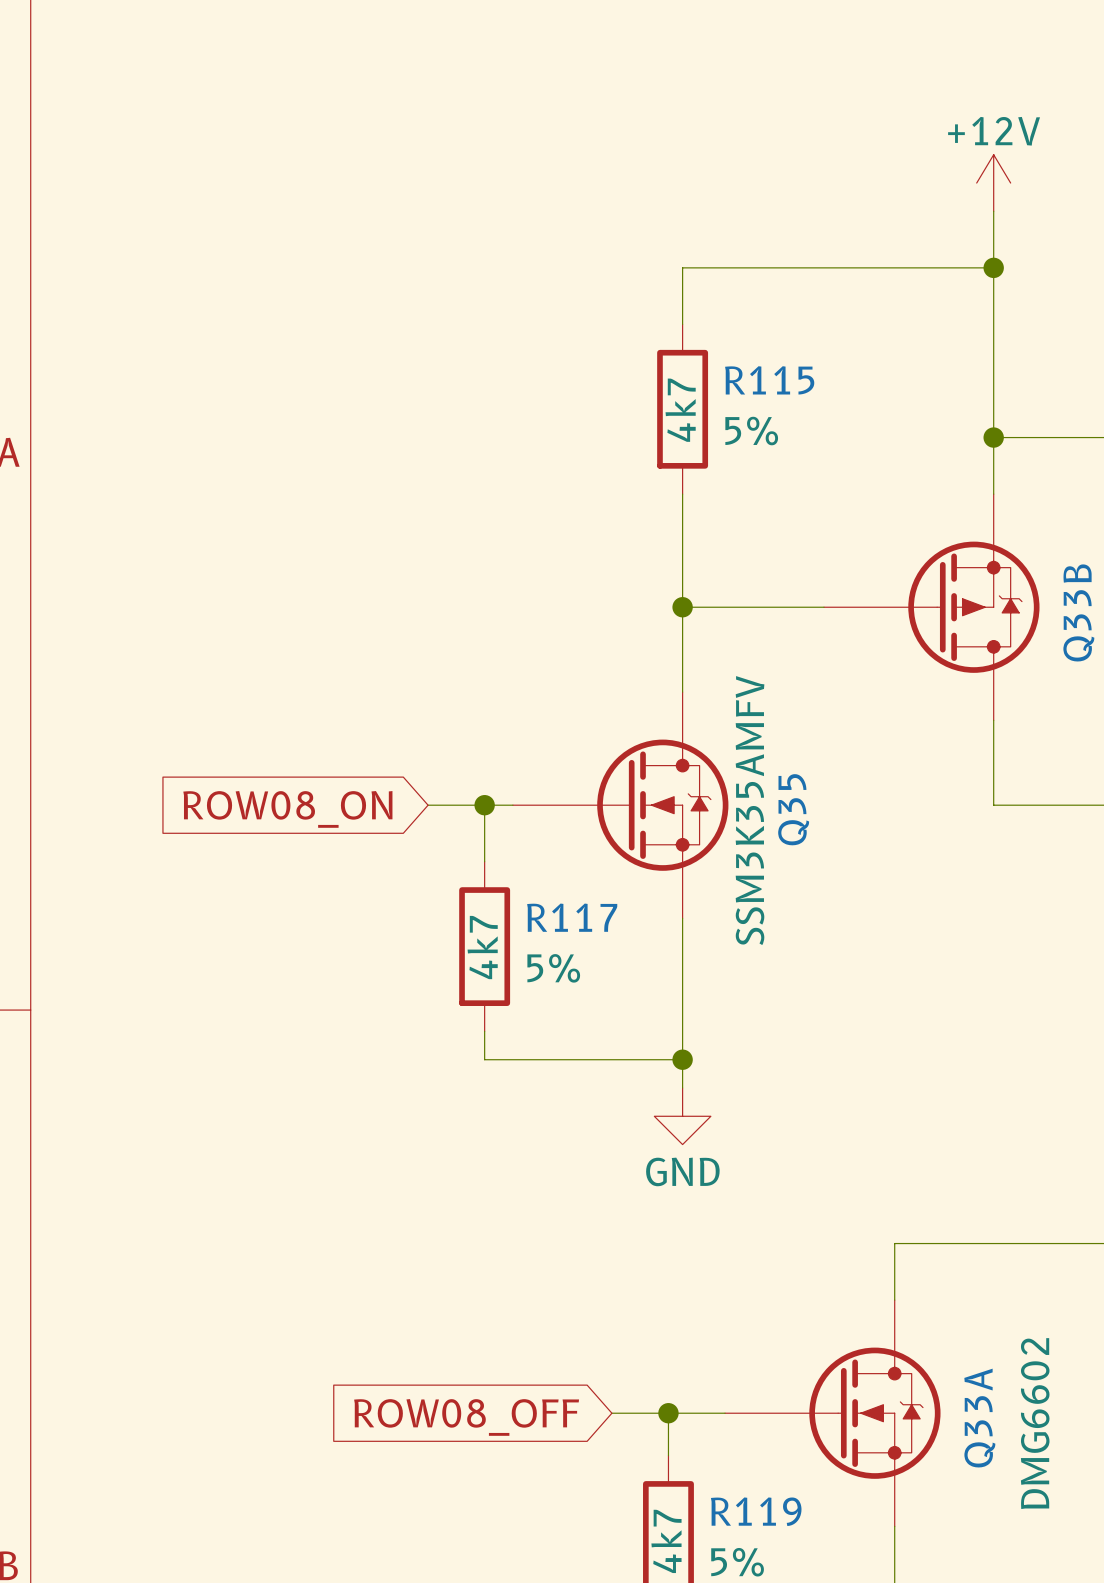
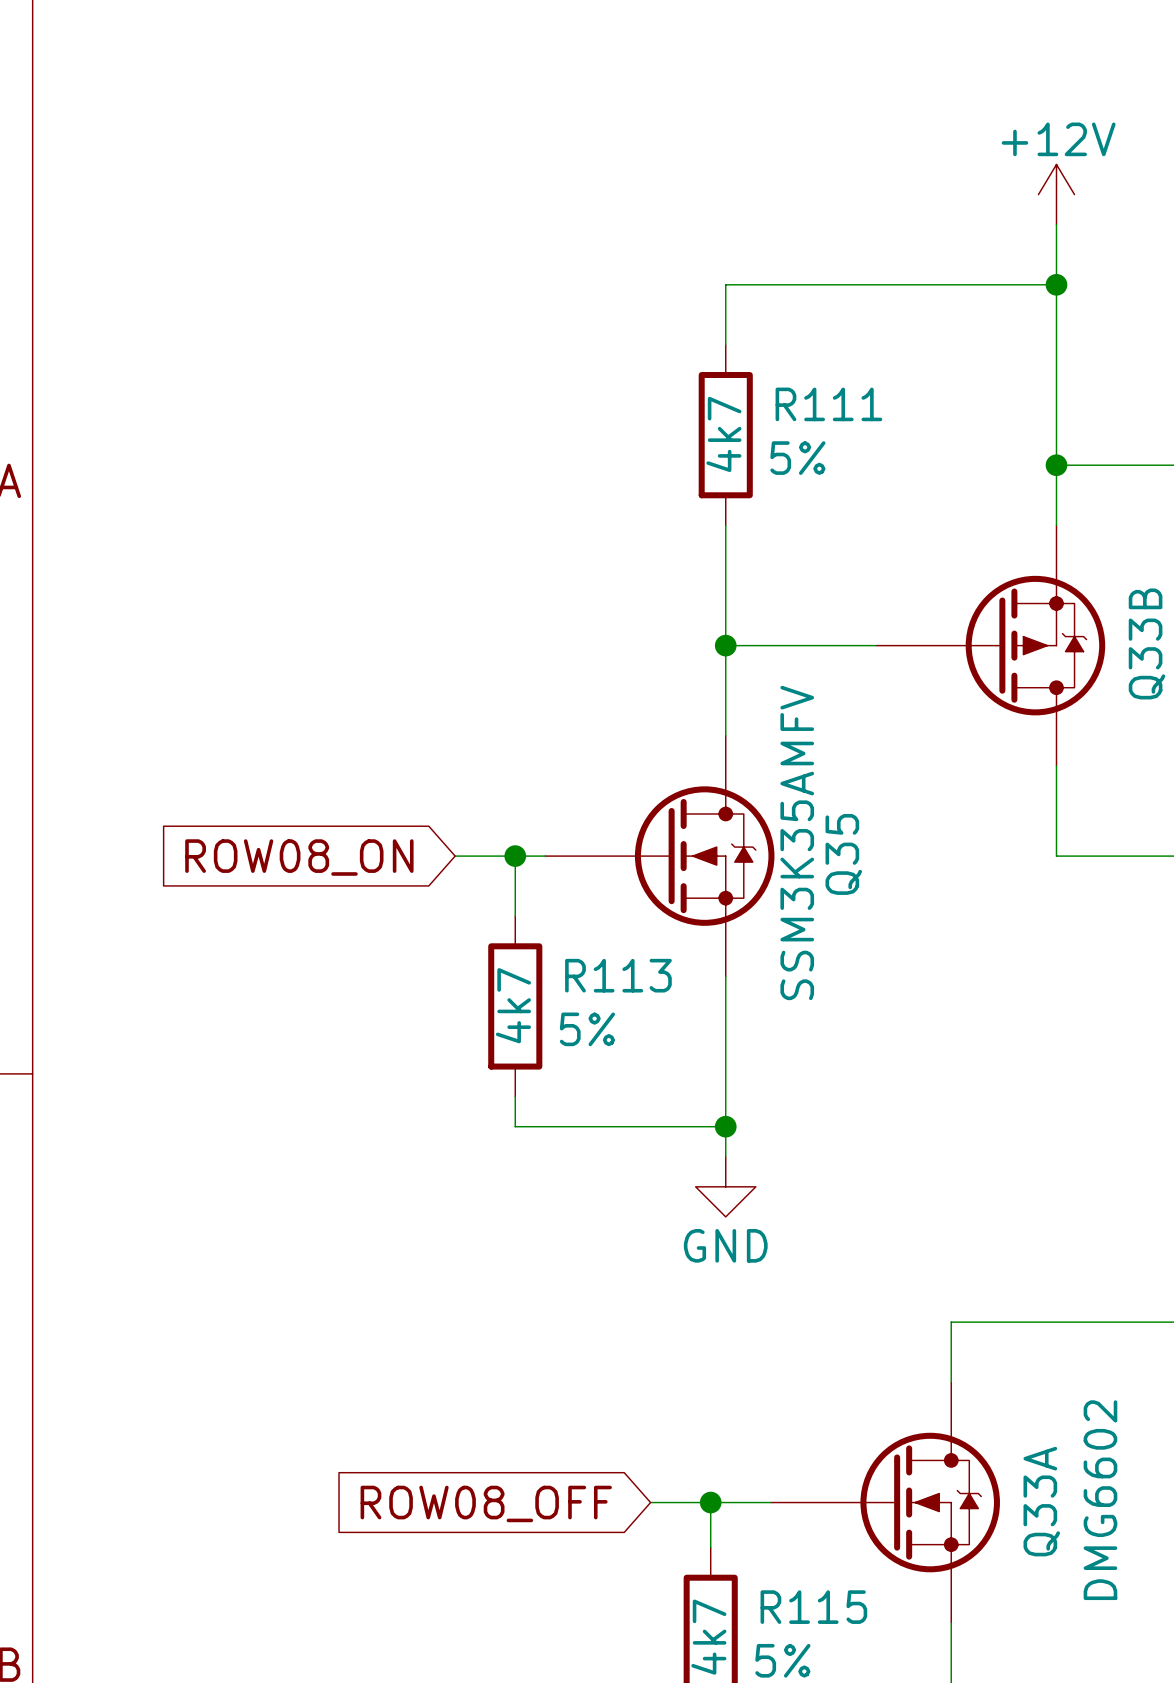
R115 name: R115 (769, 380) -> R111 (828, 404)
R117 name: R117 (572, 917) -> R113 (618, 975)
R119 name: R119 (756, 1511) -> R115 (813, 1607)

